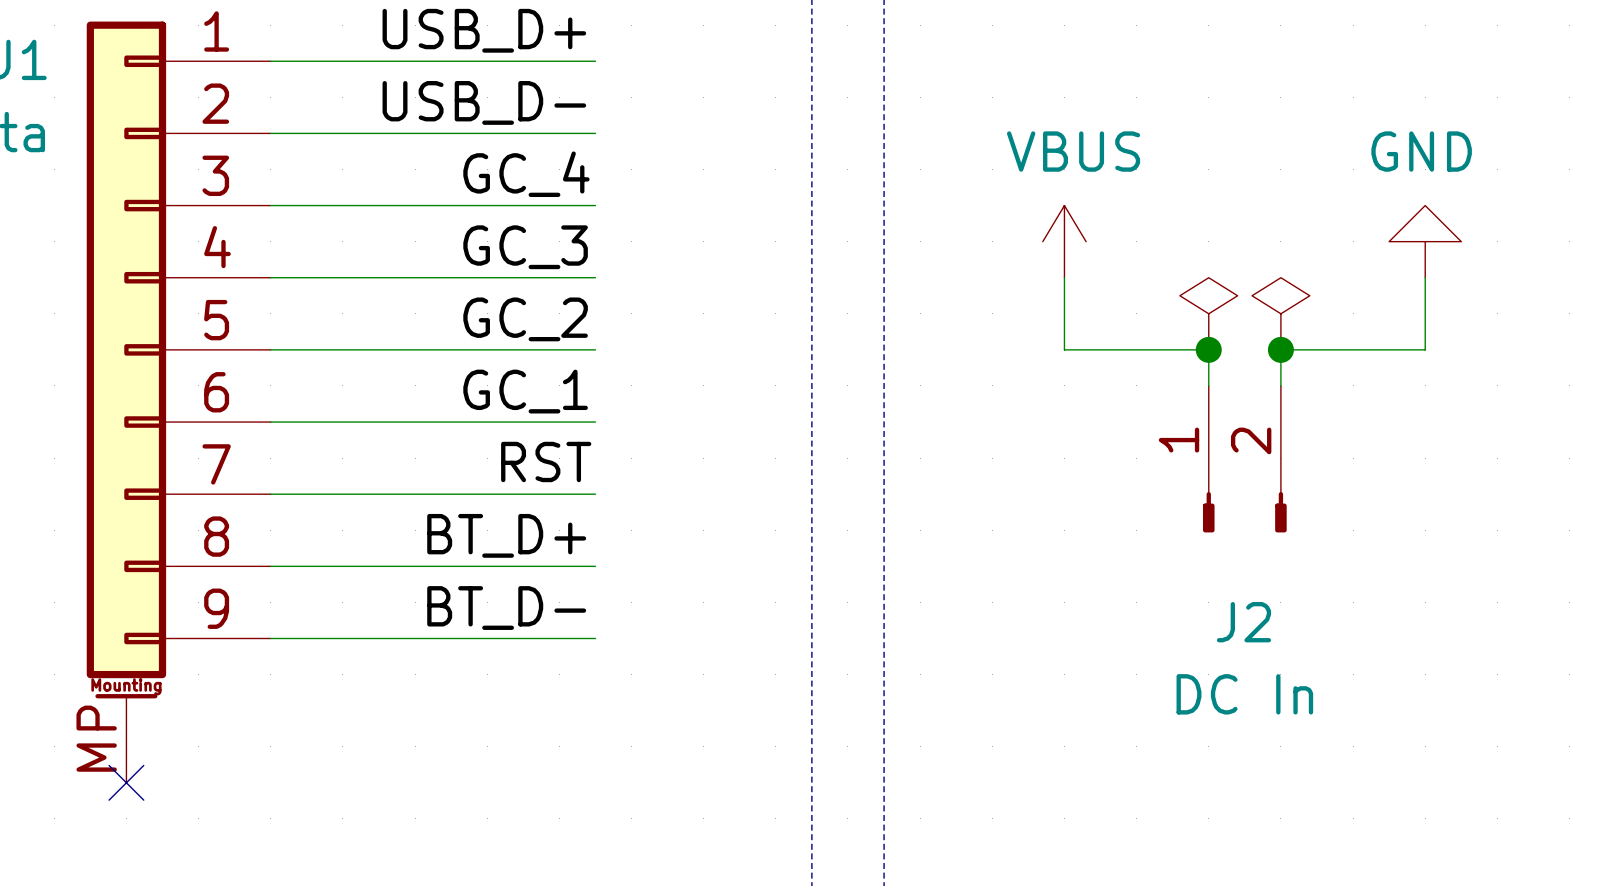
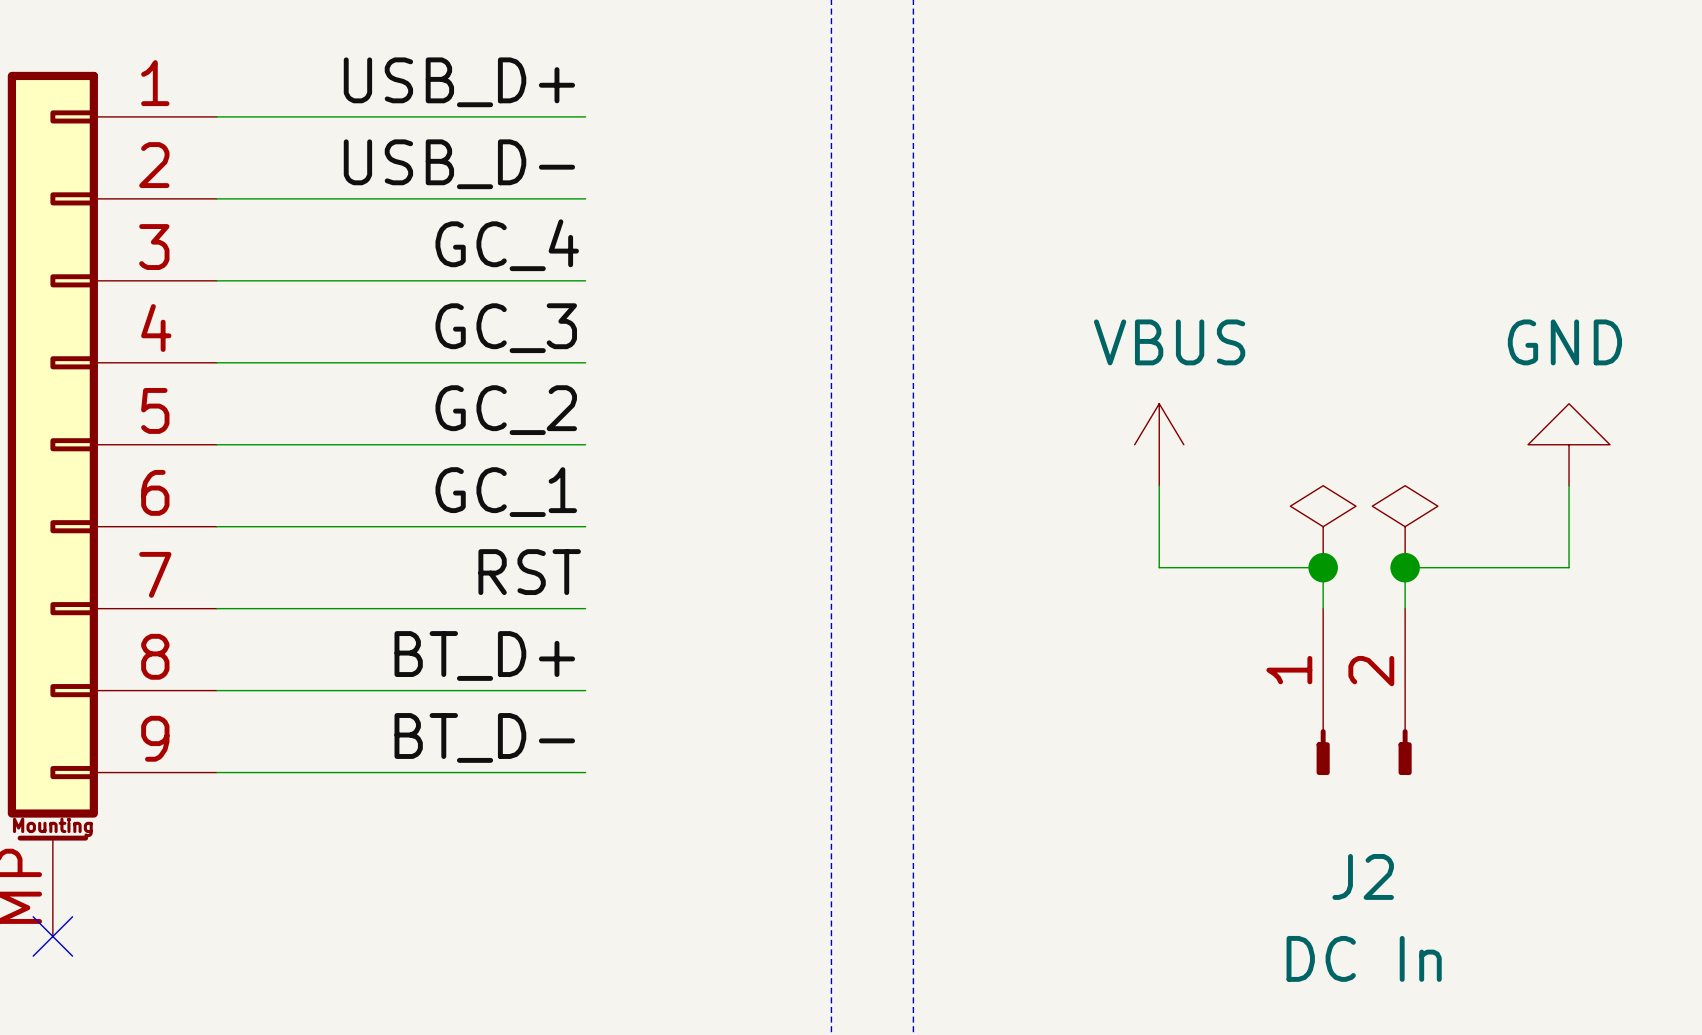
power symbol position: VBUS (1064, 241) -> VBUS (1159, 444)
power symbol position: GND (1425, 241) -> GND (1569, 444)
wire: (1064, 277) (1064, 349) (1208, 349) (1208, 385) -> (1159, 485) (1159, 567) (1323, 567) (1323, 608)
wire: (1425, 277) (1425, 349) (1280, 349) (1280, 385) -> (1569, 485) (1569, 567) (1405, 567) (1405, 608)
power symbol: (1208, 313) -> none
power symbol: (1280, 313) -> none
junction: (1208, 349) -> none
junction: (1280, 349) -> none
power symbol: none -> (1323, 526)
power symbol: none -> (1405, 526)
junction: none -> (1323, 567)
junction: none -> (1405, 567)
J2 position: (1244, 459) -> (1364, 691)

